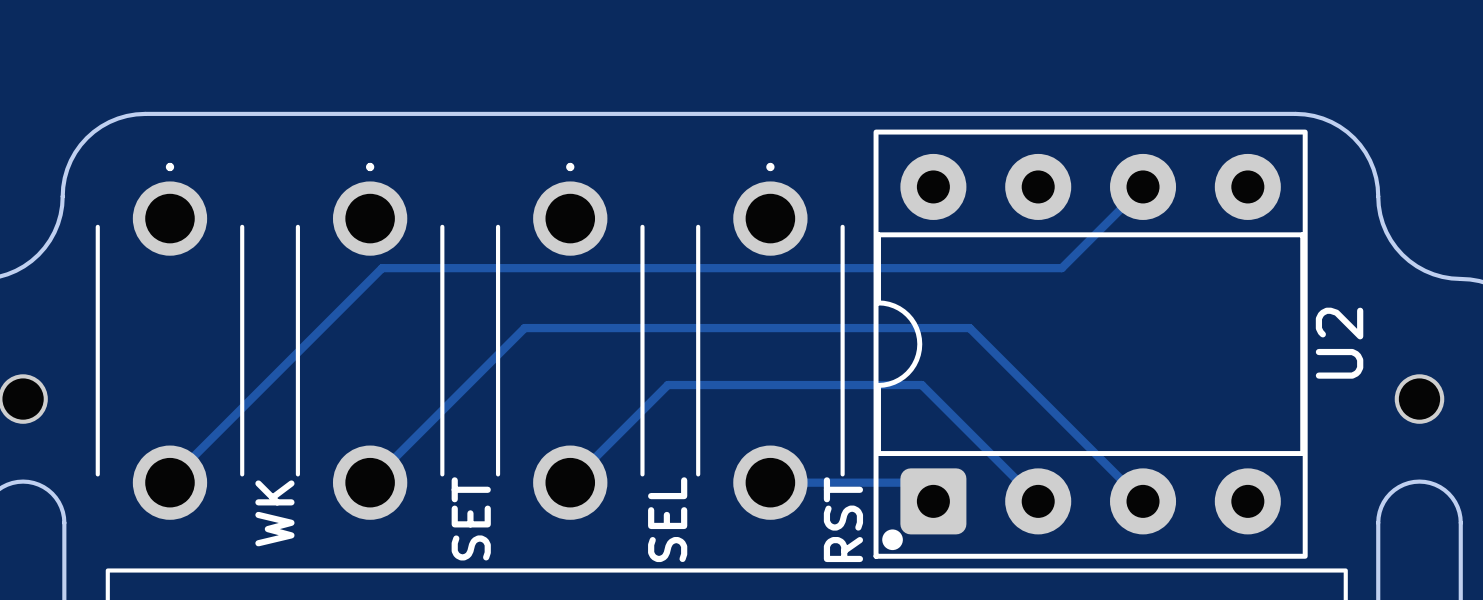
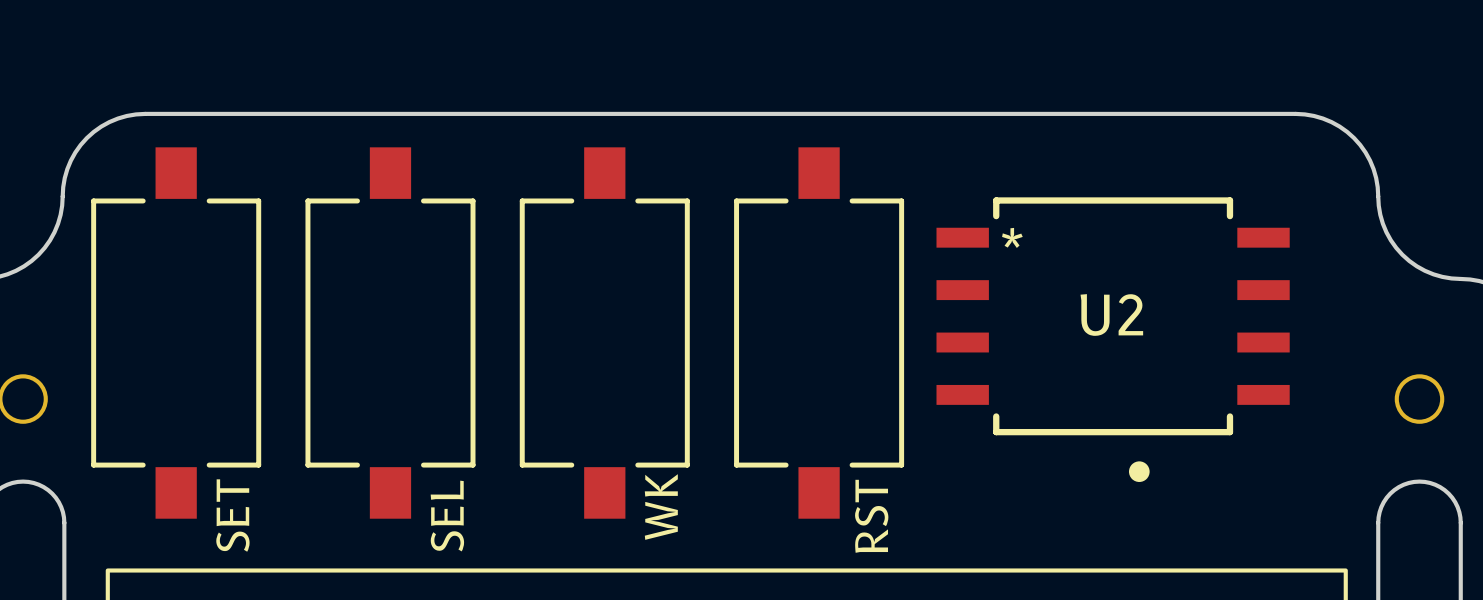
U2 footprint: [873, 129, 1308, 559] -> [936, 197, 1290, 436]
track: (1143, 186) (1061, 268) (382, 268) (177, 473) -> none
part: none -> SET (176, 333)
part: none -> SEL (390, 333)
part: none -> WK (604, 333)
part: none -> RST (819, 333)
WK: (169, 341) -> none
SET: (370, 341) -> none
SEL: (570, 341) -> none
RST: (770, 341) -> none
U2 name position: U2 (1339, 343) -> U2 (1111, 315)
track: (370, 482) (524, 328) (969, 328) (1143, 501) -> none
track: (570, 482) (667, 385) (921, 385) (1038, 501) -> none
track: (770, 482) (914, 482) (933, 501) -> none
drawing position: (892, 539) -> (1139, 471)

